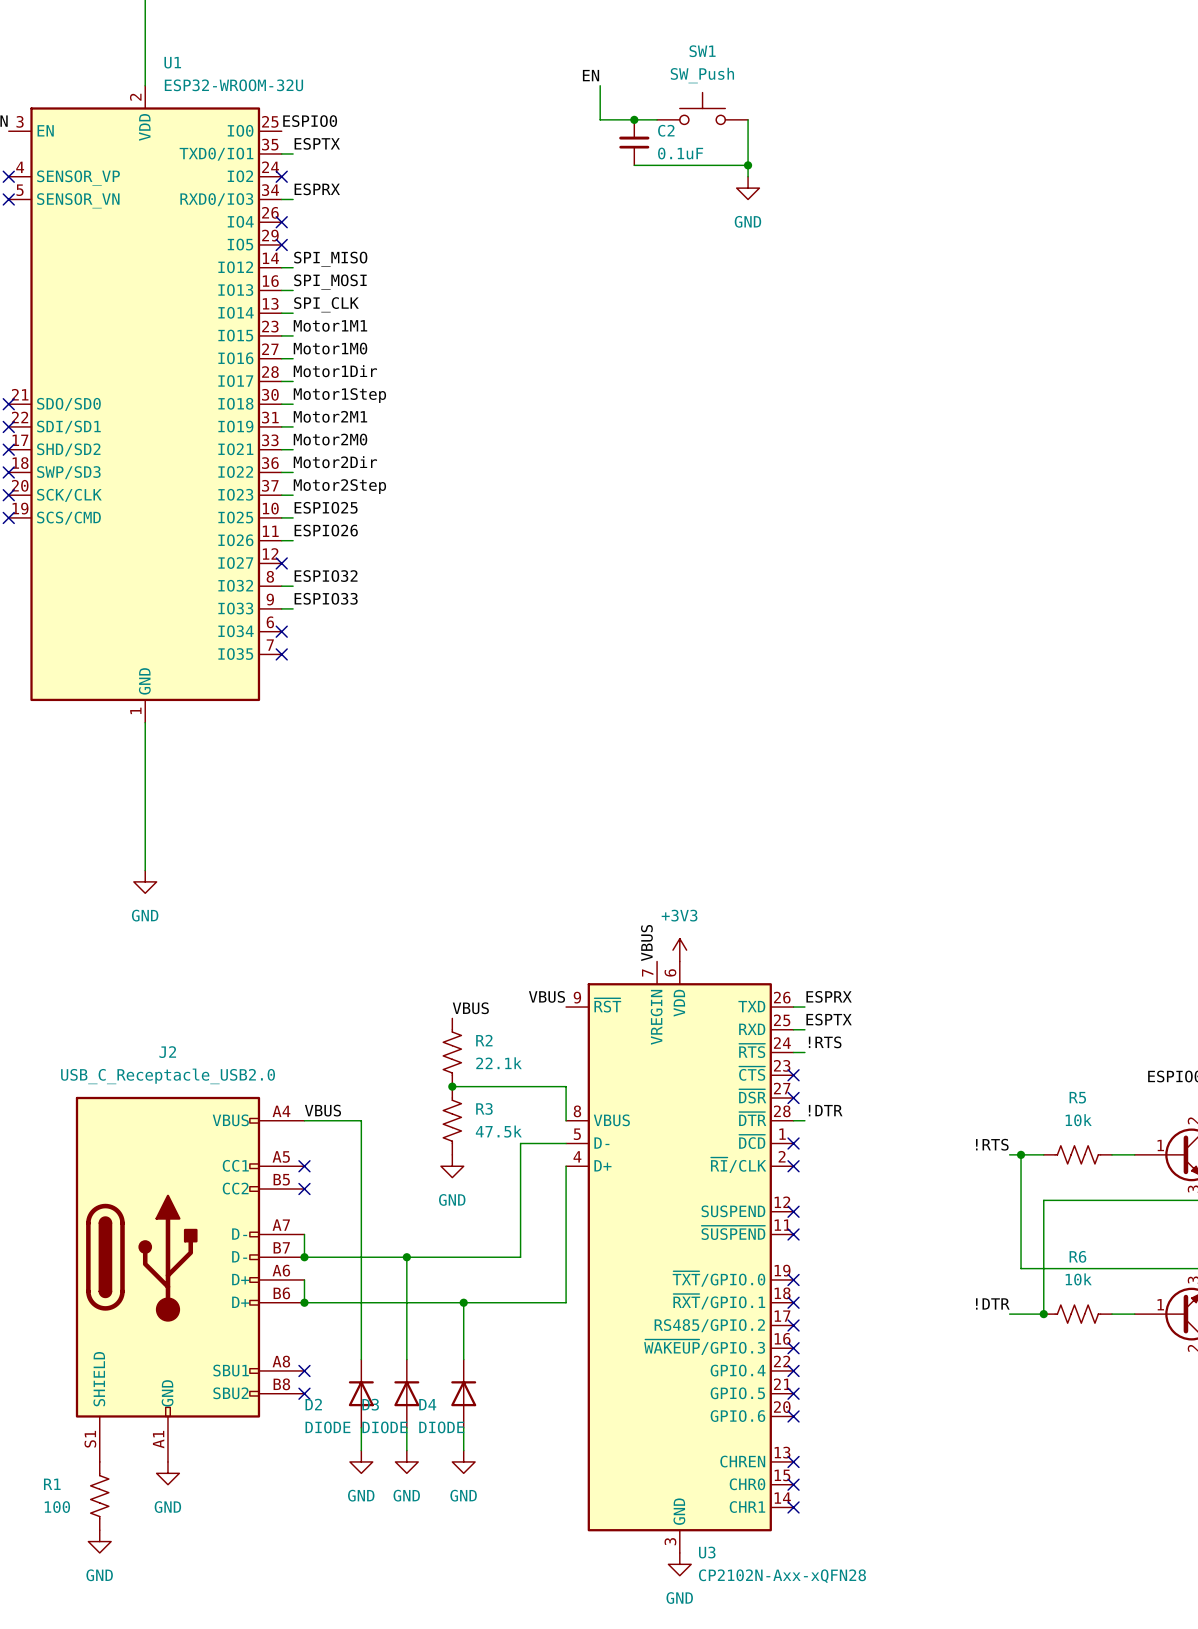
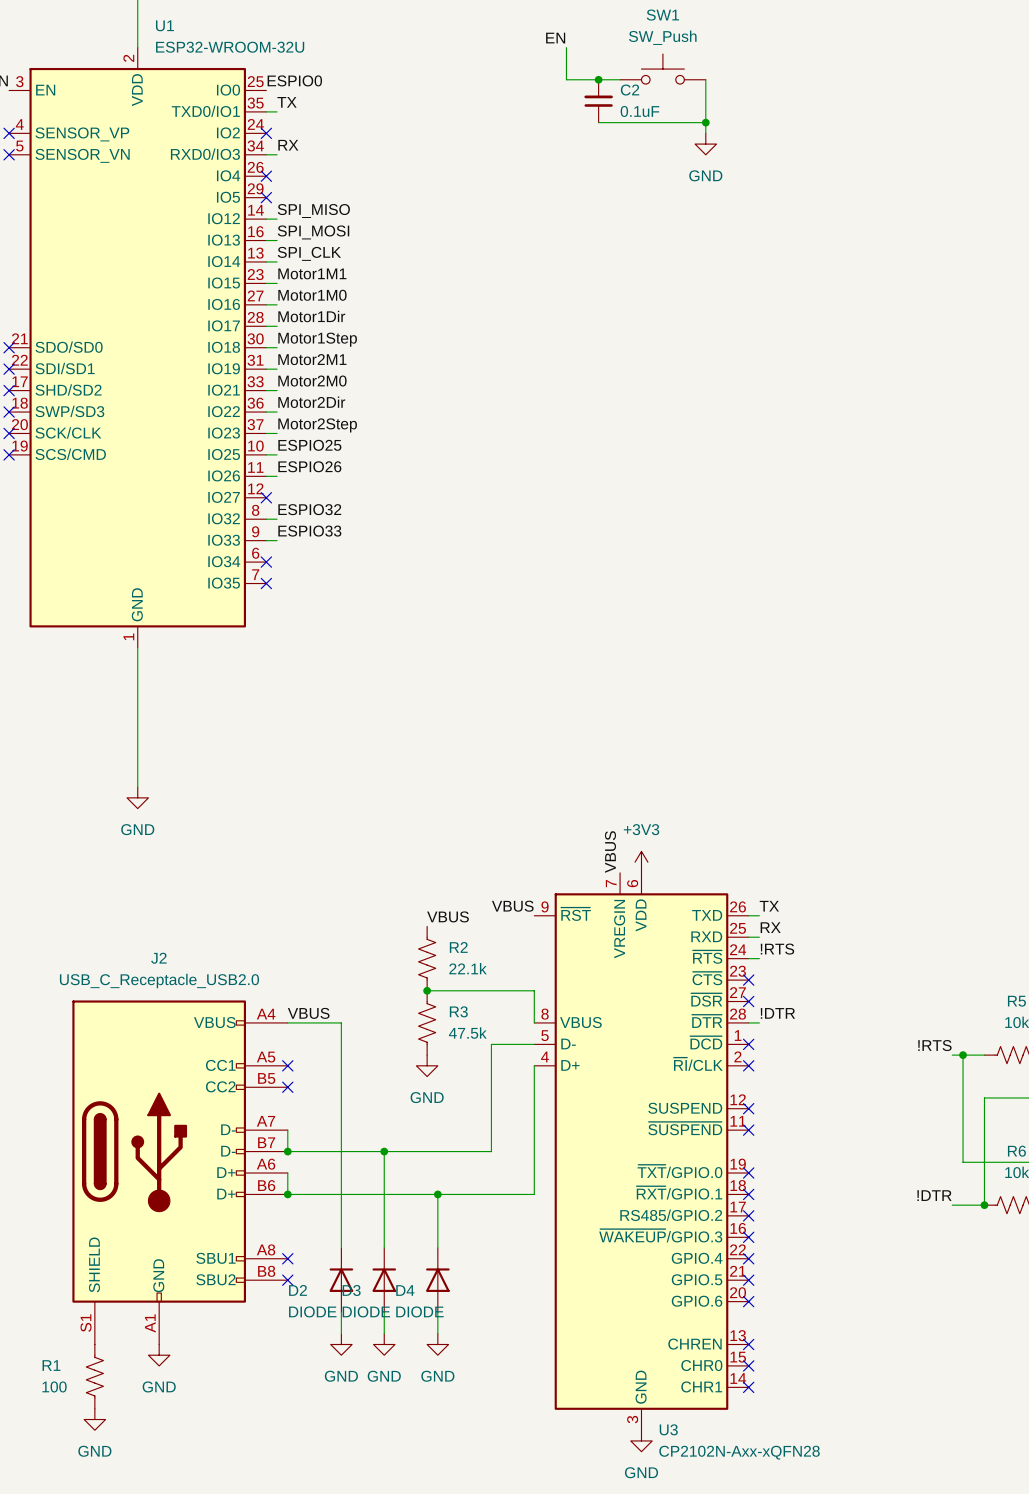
label: ESPTX (317, 143) -> TX (287, 102)
label: ESPRX (317, 189) -> RX (288, 145)
label: ESPRX (829, 996) -> TX (769, 906)
label: ESPTX (829, 1019) -> RX (770, 927)

